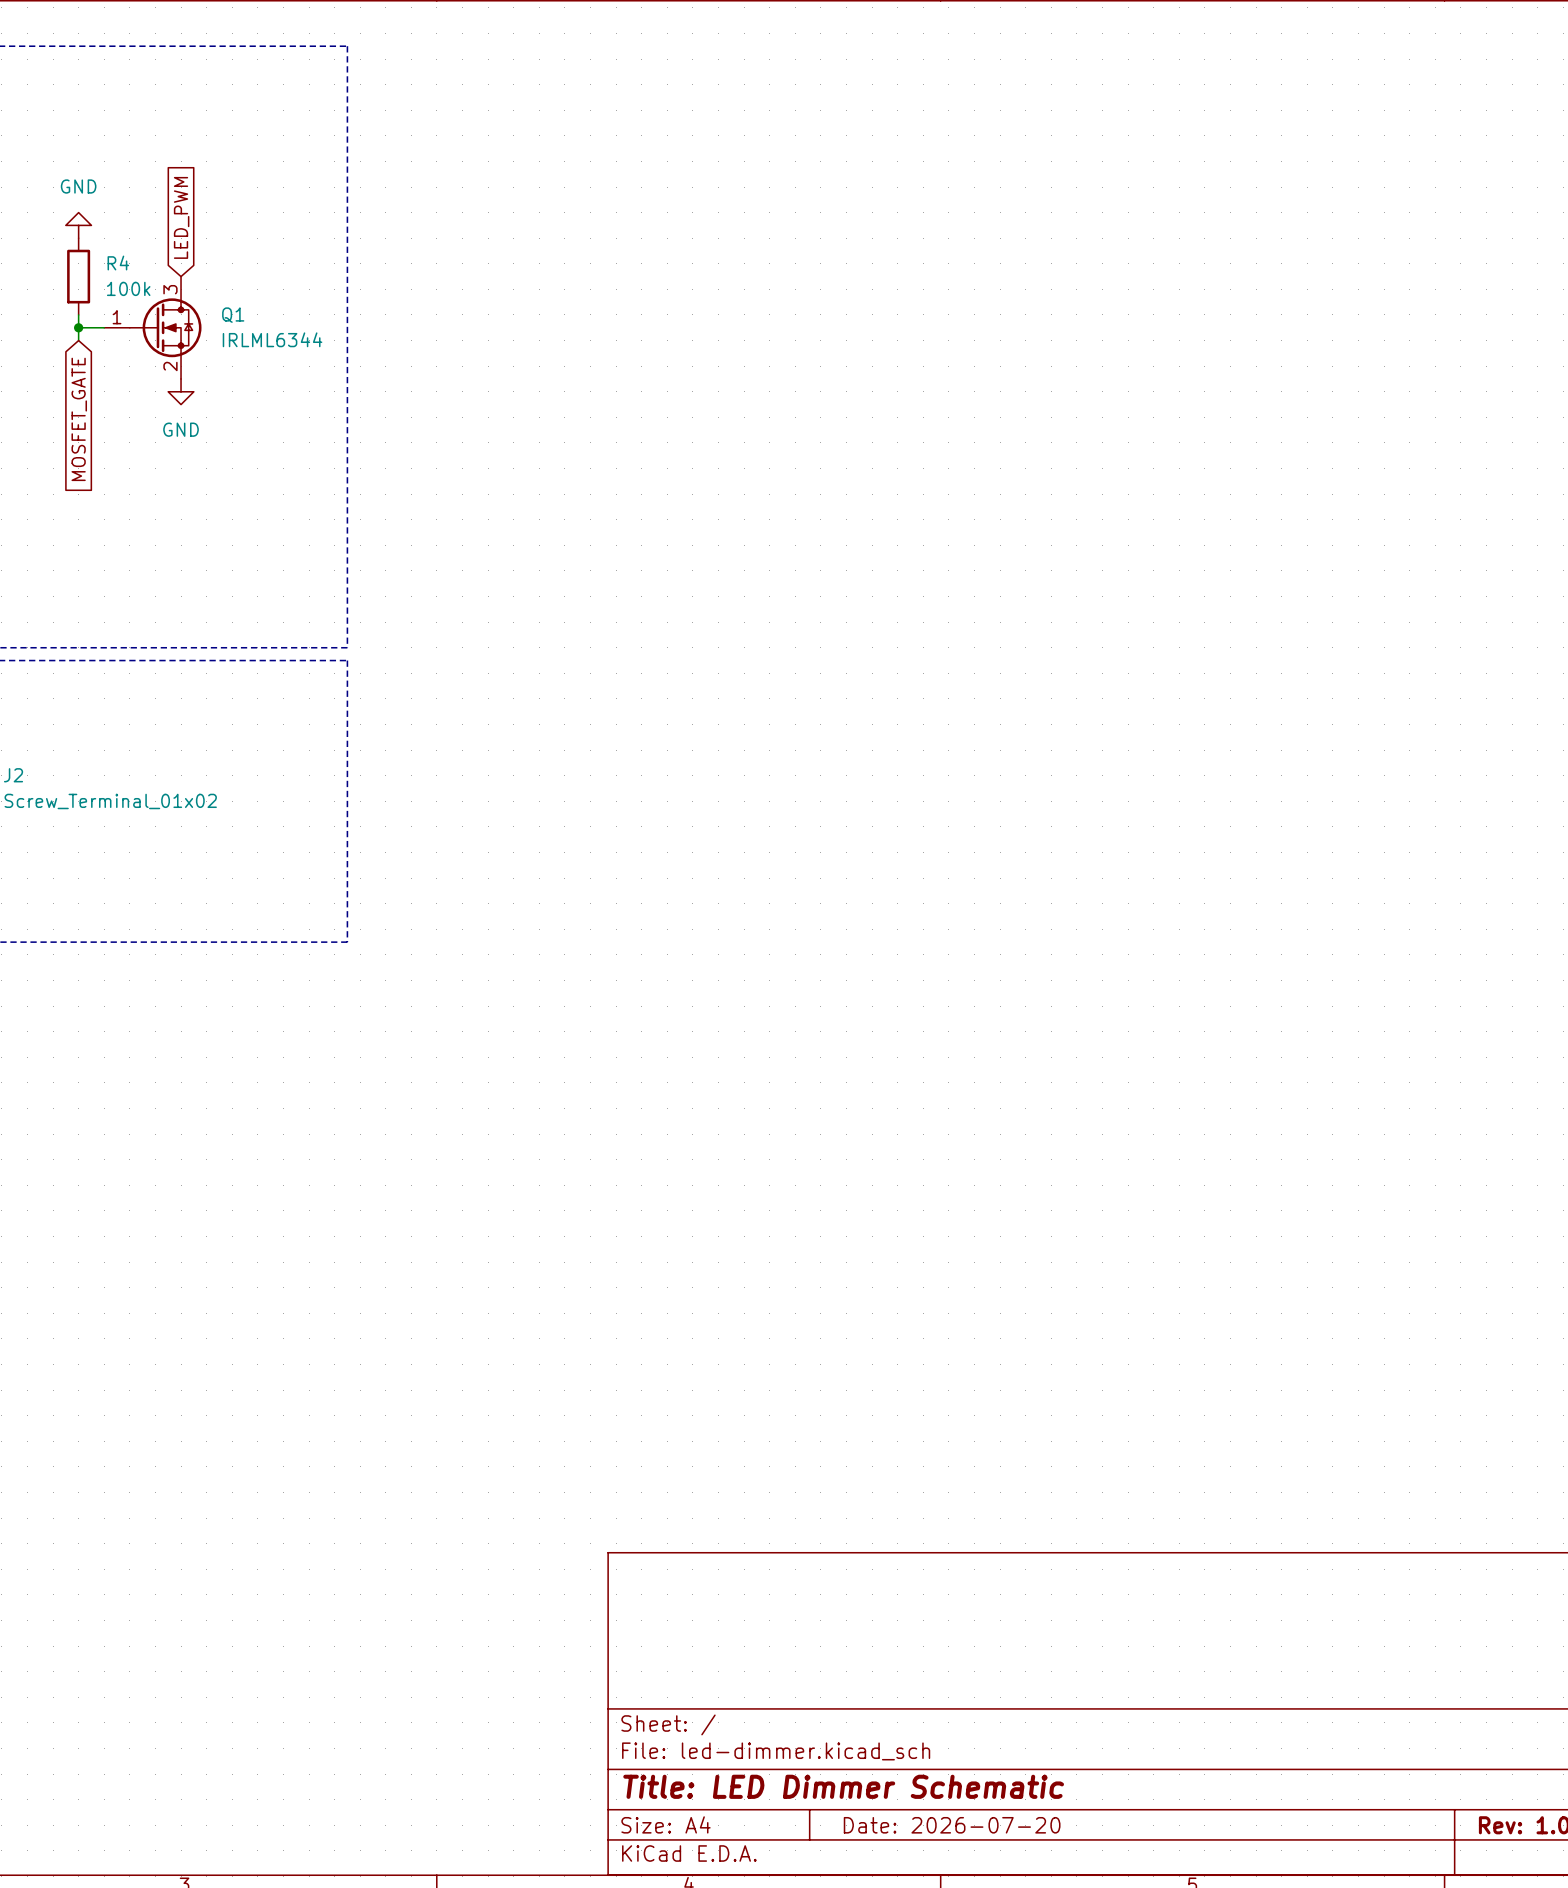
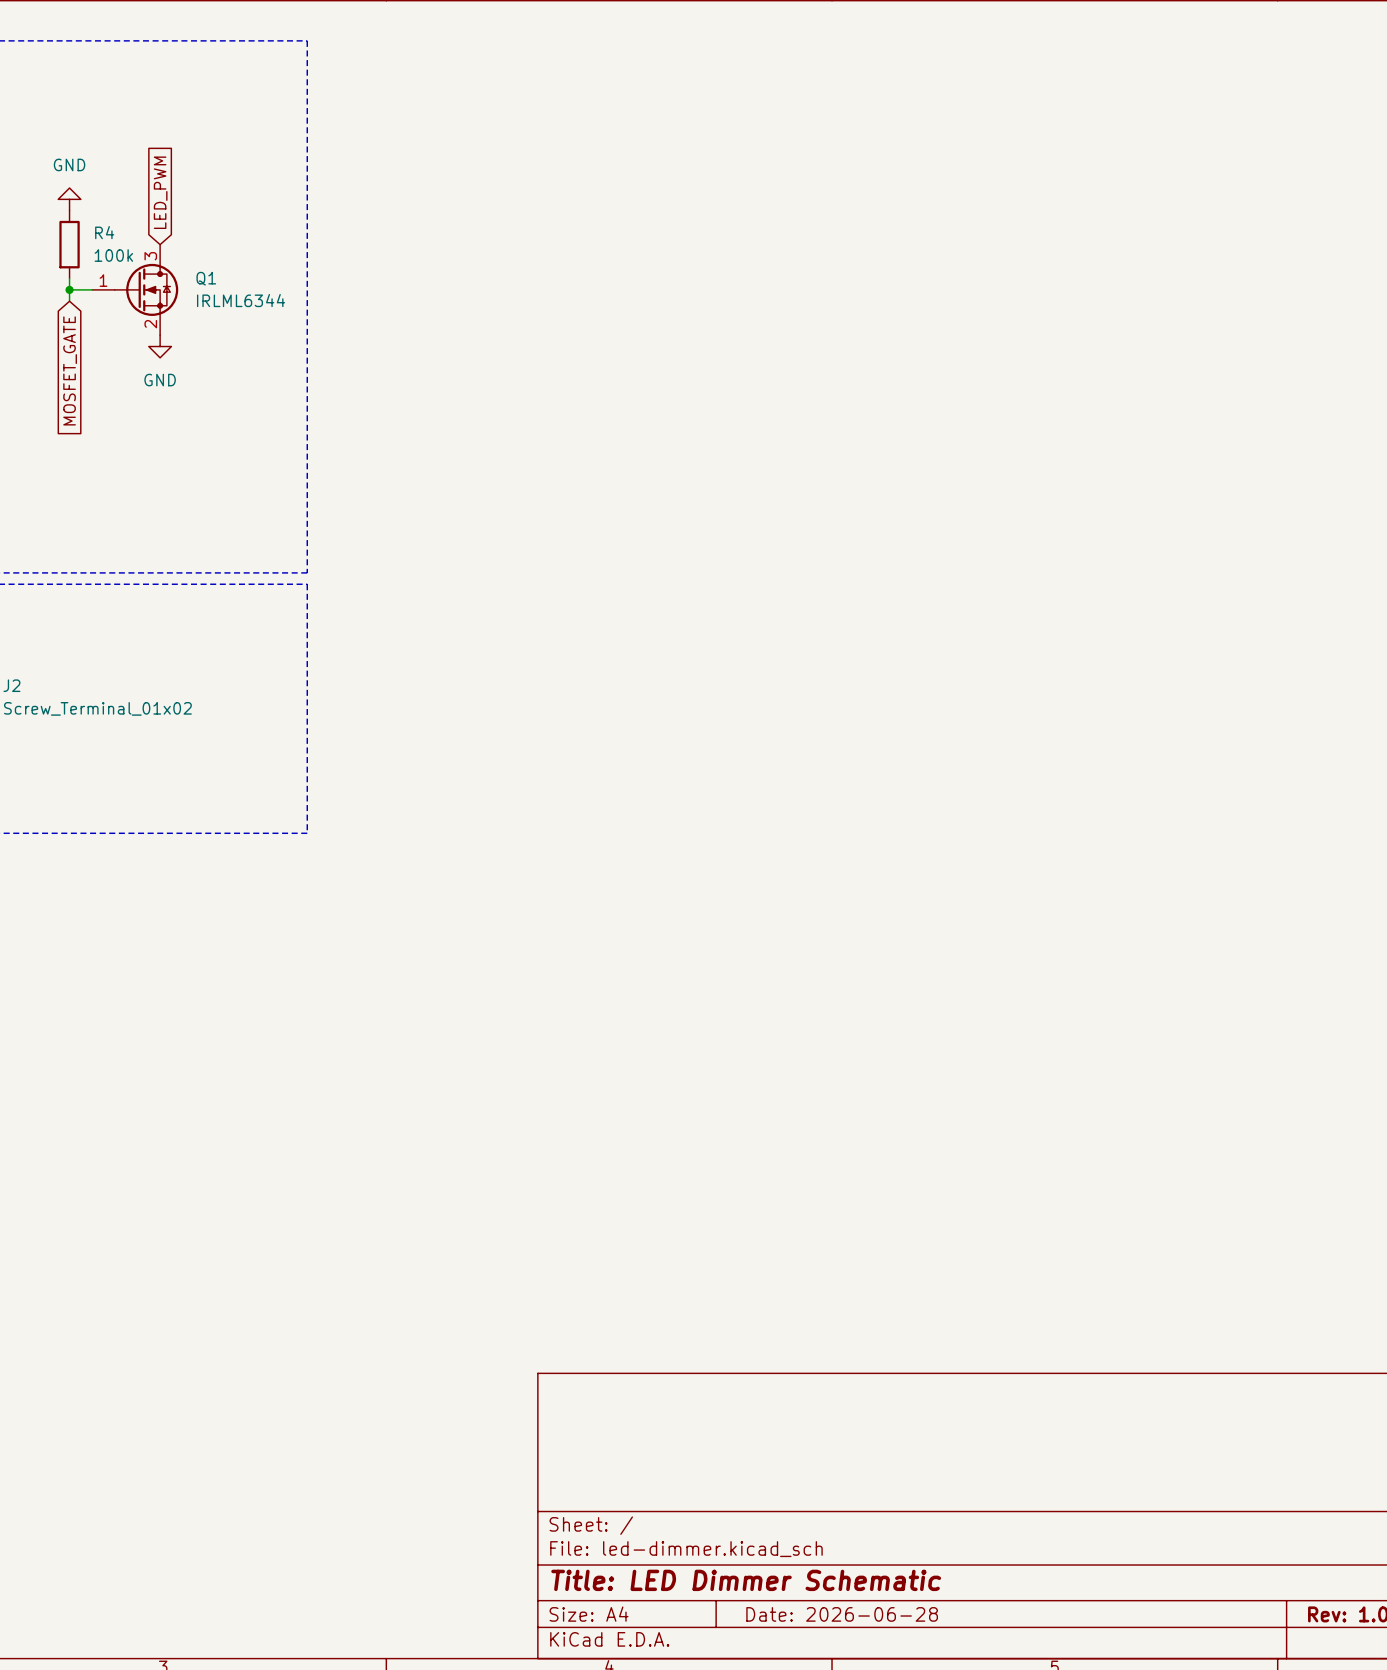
title block: Date: 2026-07-20 (952, 1825) -> Date: 2026-06-28 (842, 1614)

